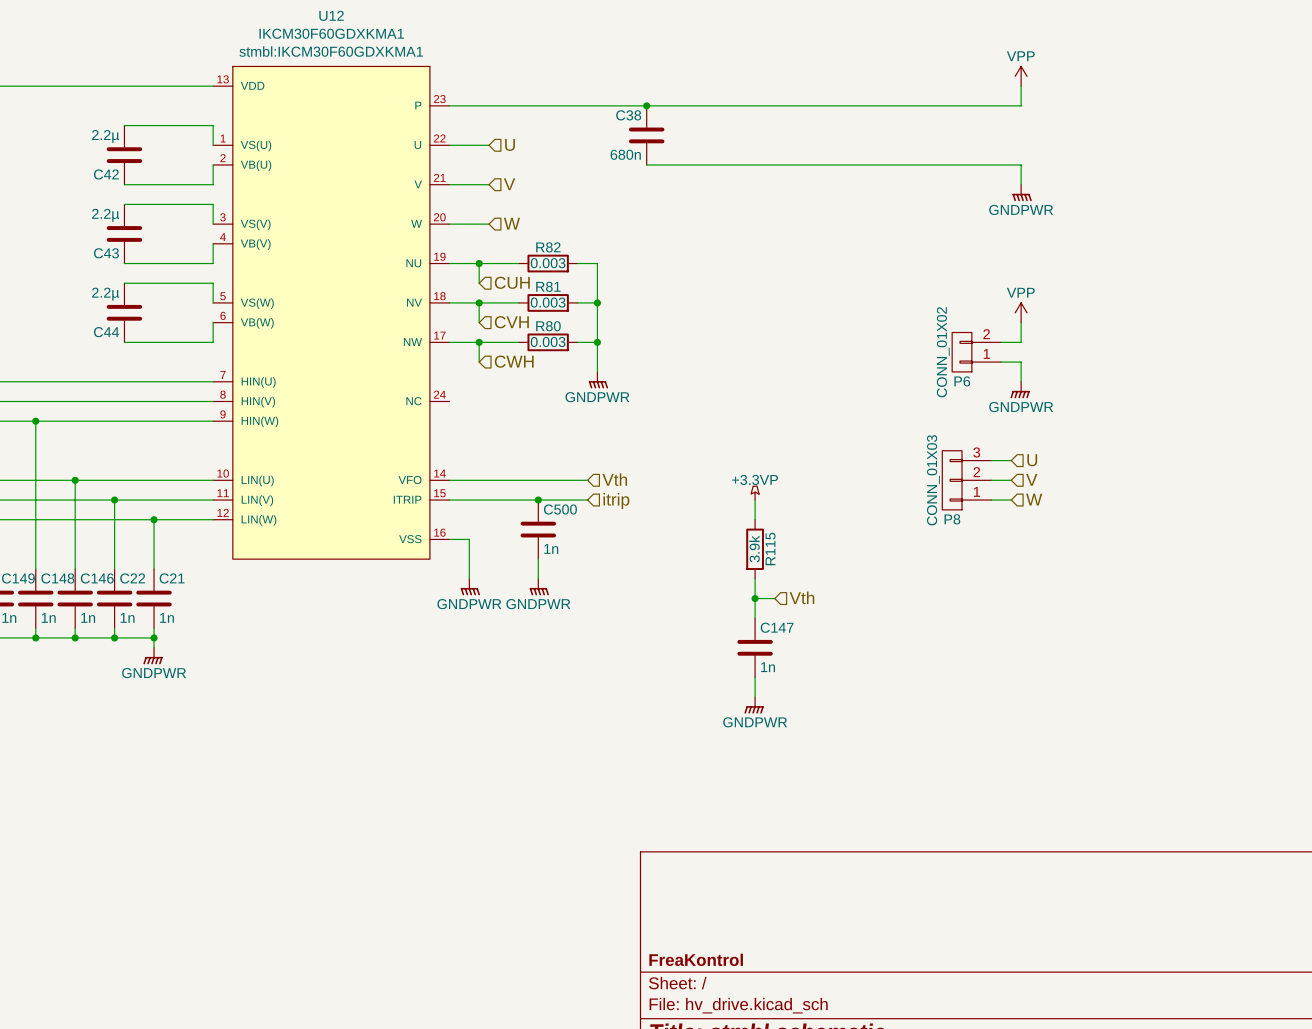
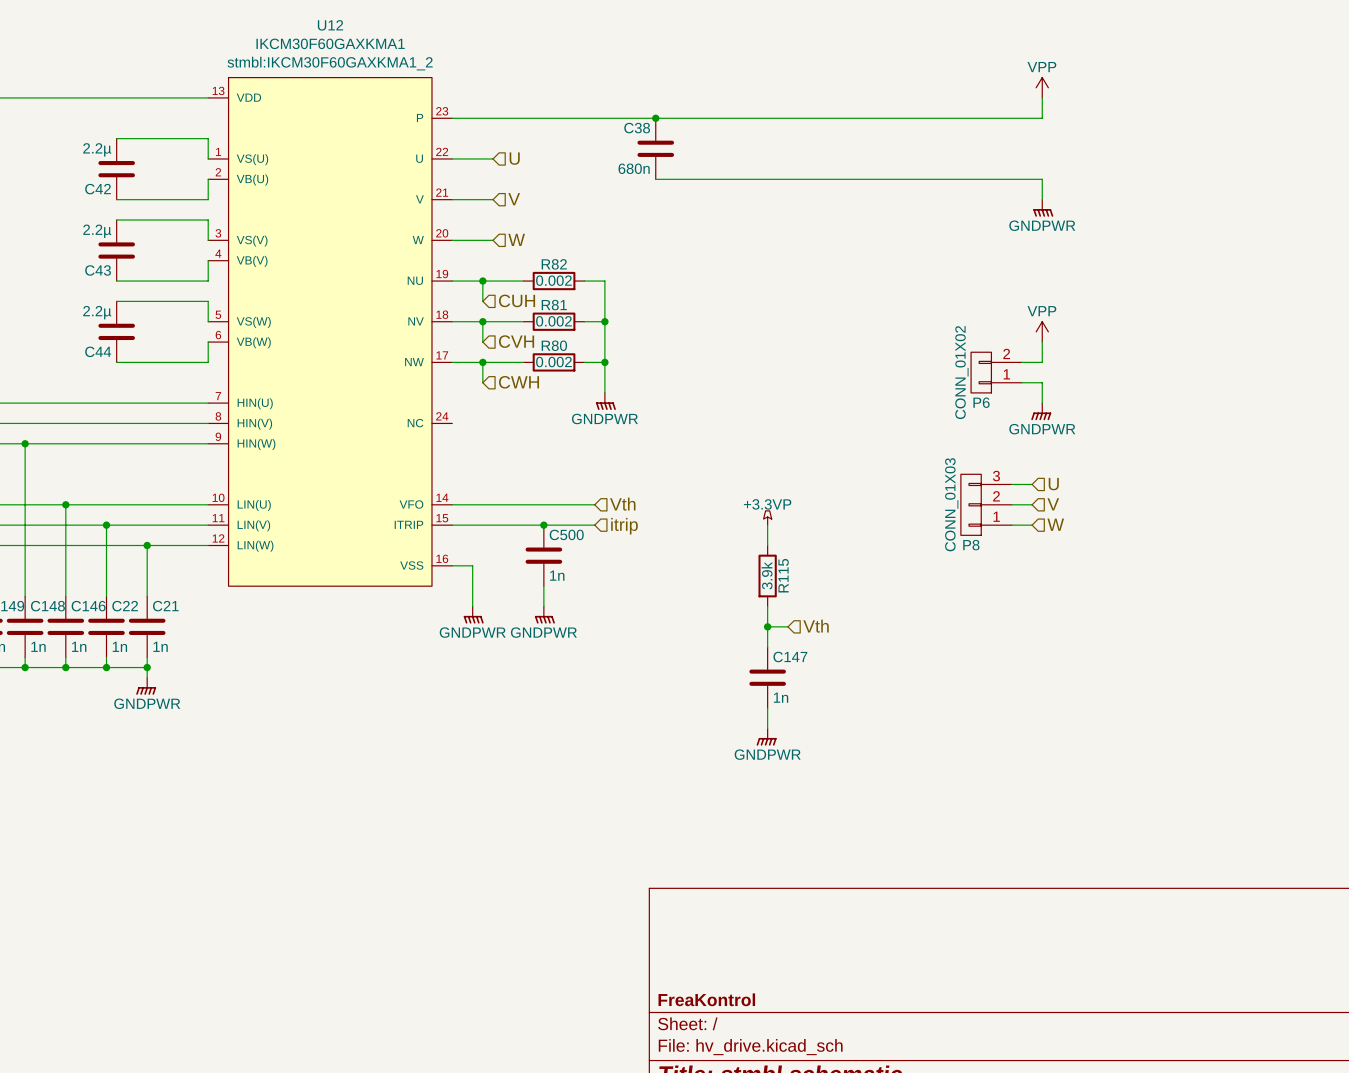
U12 value: IKCM30F60GDXKMA1 (331, 33) -> IKCM30F60GAXKMA1 (330, 43)
U12 text: stmbl:IKCM30F60GDXKMA1 (331, 51) -> stmbl:IKCM30F60GAXKMA1_2 (330, 63)
R82 value: 0.003 (548, 263) -> 0.002 (553, 280)
R81 value: 0.003 (548, 302) -> 0.002 (553, 321)
R80 value: 0.003 (548, 341) -> 0.002 (553, 362)

